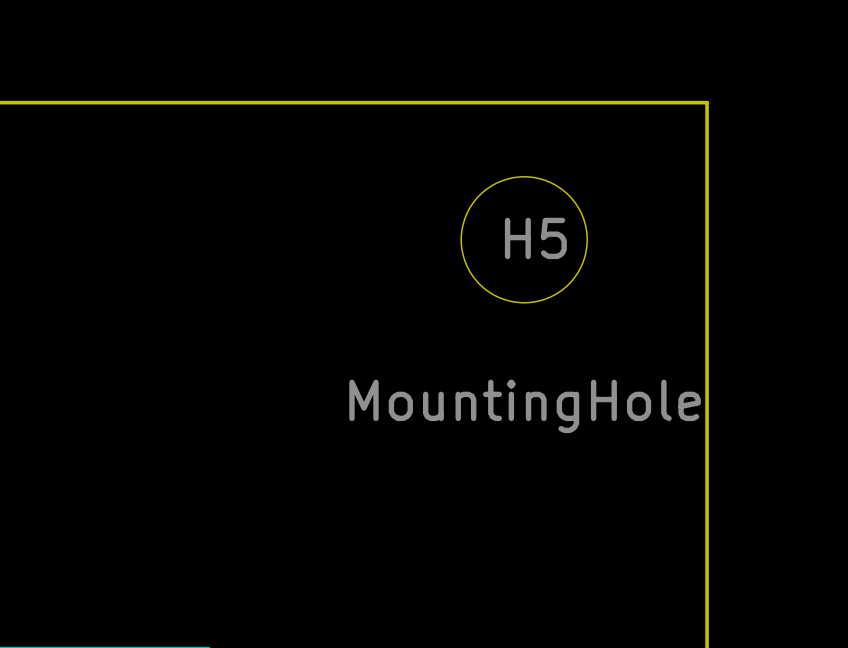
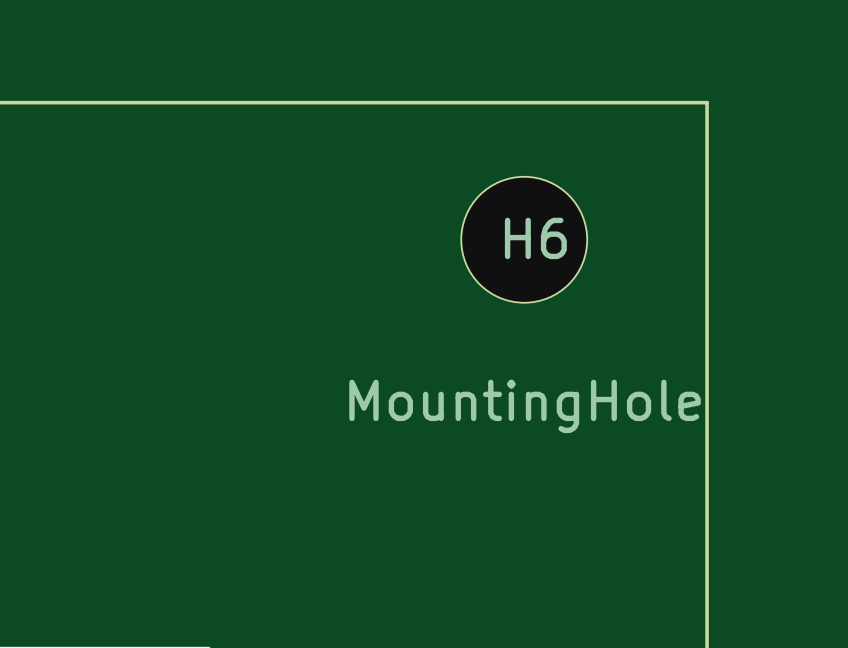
H5 name: H5 (535, 238) -> H6 (535, 238)

